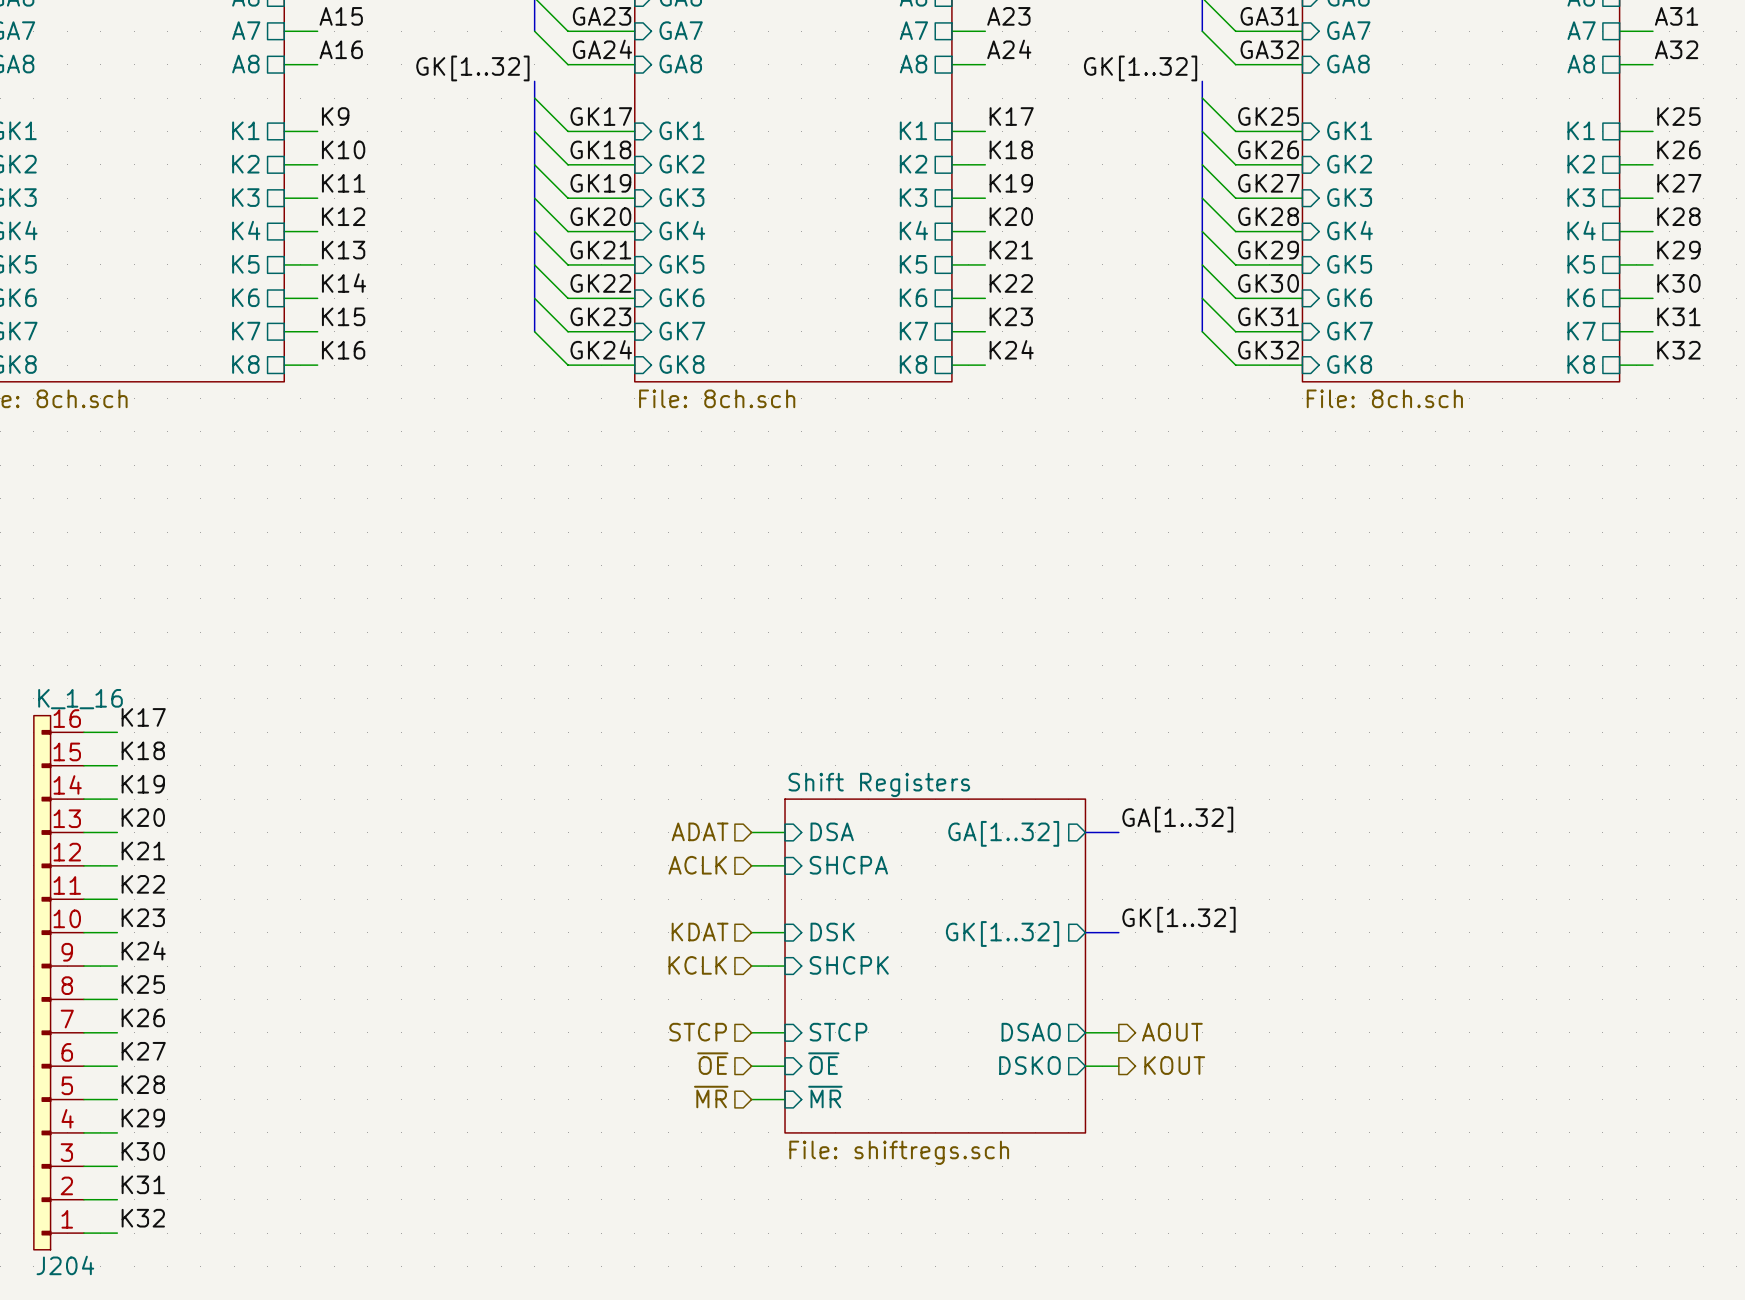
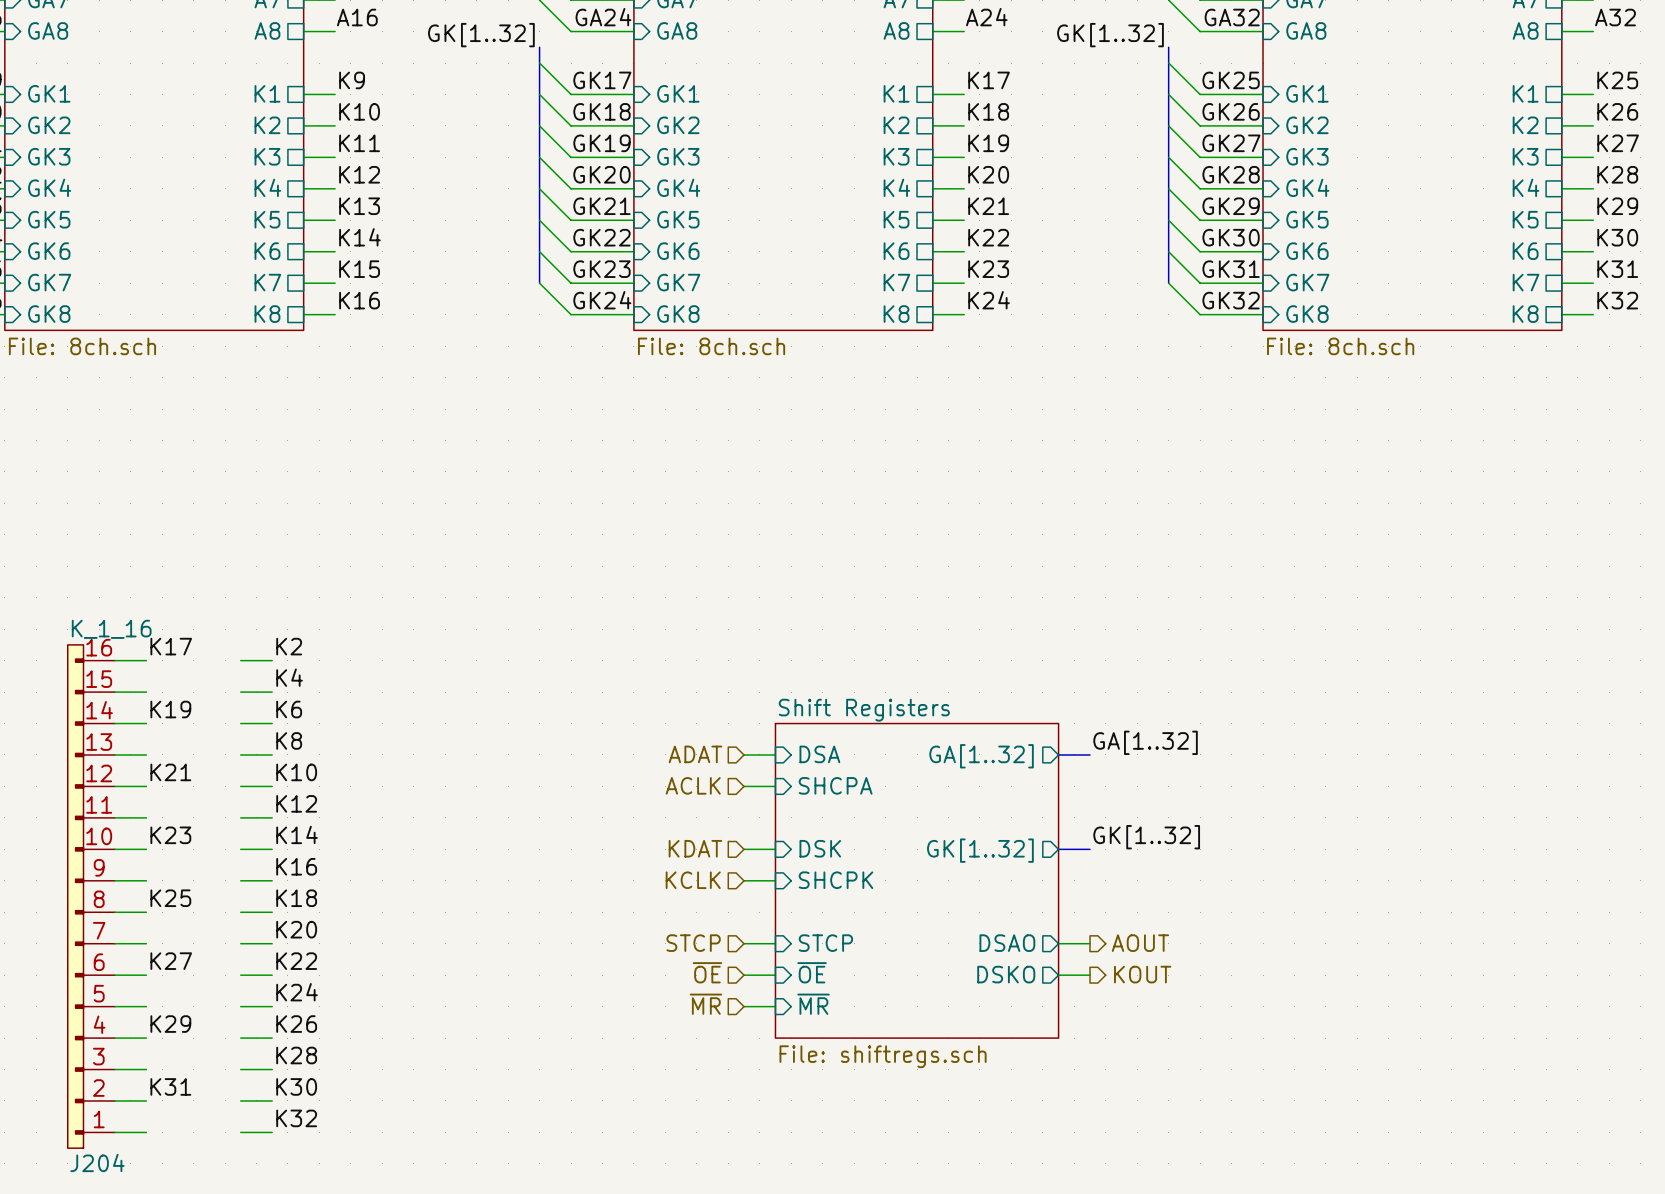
label: none -> K2 (289, 646)
wire: none -> (240, 660) (272, 660)
label position: K18 (143, 750) -> K18 (296, 898)
label: none -> K4 (289, 677)
wire: none -> (240, 692) (272, 692)
label: none -> K6 (289, 709)
wire: none -> (240, 723) (272, 723)
label position: K20 (143, 817) -> K20 (296, 929)
label: none -> K8 (289, 740)
wire: none -> (240, 754) (272, 754)
label: none -> K10 (296, 772)
wire: none -> (240, 786) (272, 786)
label position: K22 (143, 884) -> K22 (296, 961)
label: none -> K12 (296, 803)
wire: none -> (240, 817) (272, 817)
label: none -> K14 (297, 834)
wire: none -> (240, 849) (272, 849)
label position: K24 (143, 950) -> K24 (297, 992)
label: none -> K16 (296, 866)
wire: none -> (240, 880) (272, 880)
wire: none -> (240, 912) (272, 912)
label position: K26 (143, 1017) -> K26 (296, 1024)
wire: none -> (240, 943) (272, 943)
wire: none -> (240, 975) (272, 975)
label position: K28 (143, 1084) -> K28 (296, 1055)
wire: none -> (240, 1006) (272, 1006)
wire: none -> (240, 1038) (272, 1038)
label position: K30 (143, 1151) -> K30 (296, 1086)
wire: none -> (240, 1069) (272, 1069)
wire: none -> (240, 1100) (272, 1100)
label position: K32 (143, 1218) -> K32 (296, 1118)
wire: none -> (240, 1132) (272, 1132)

